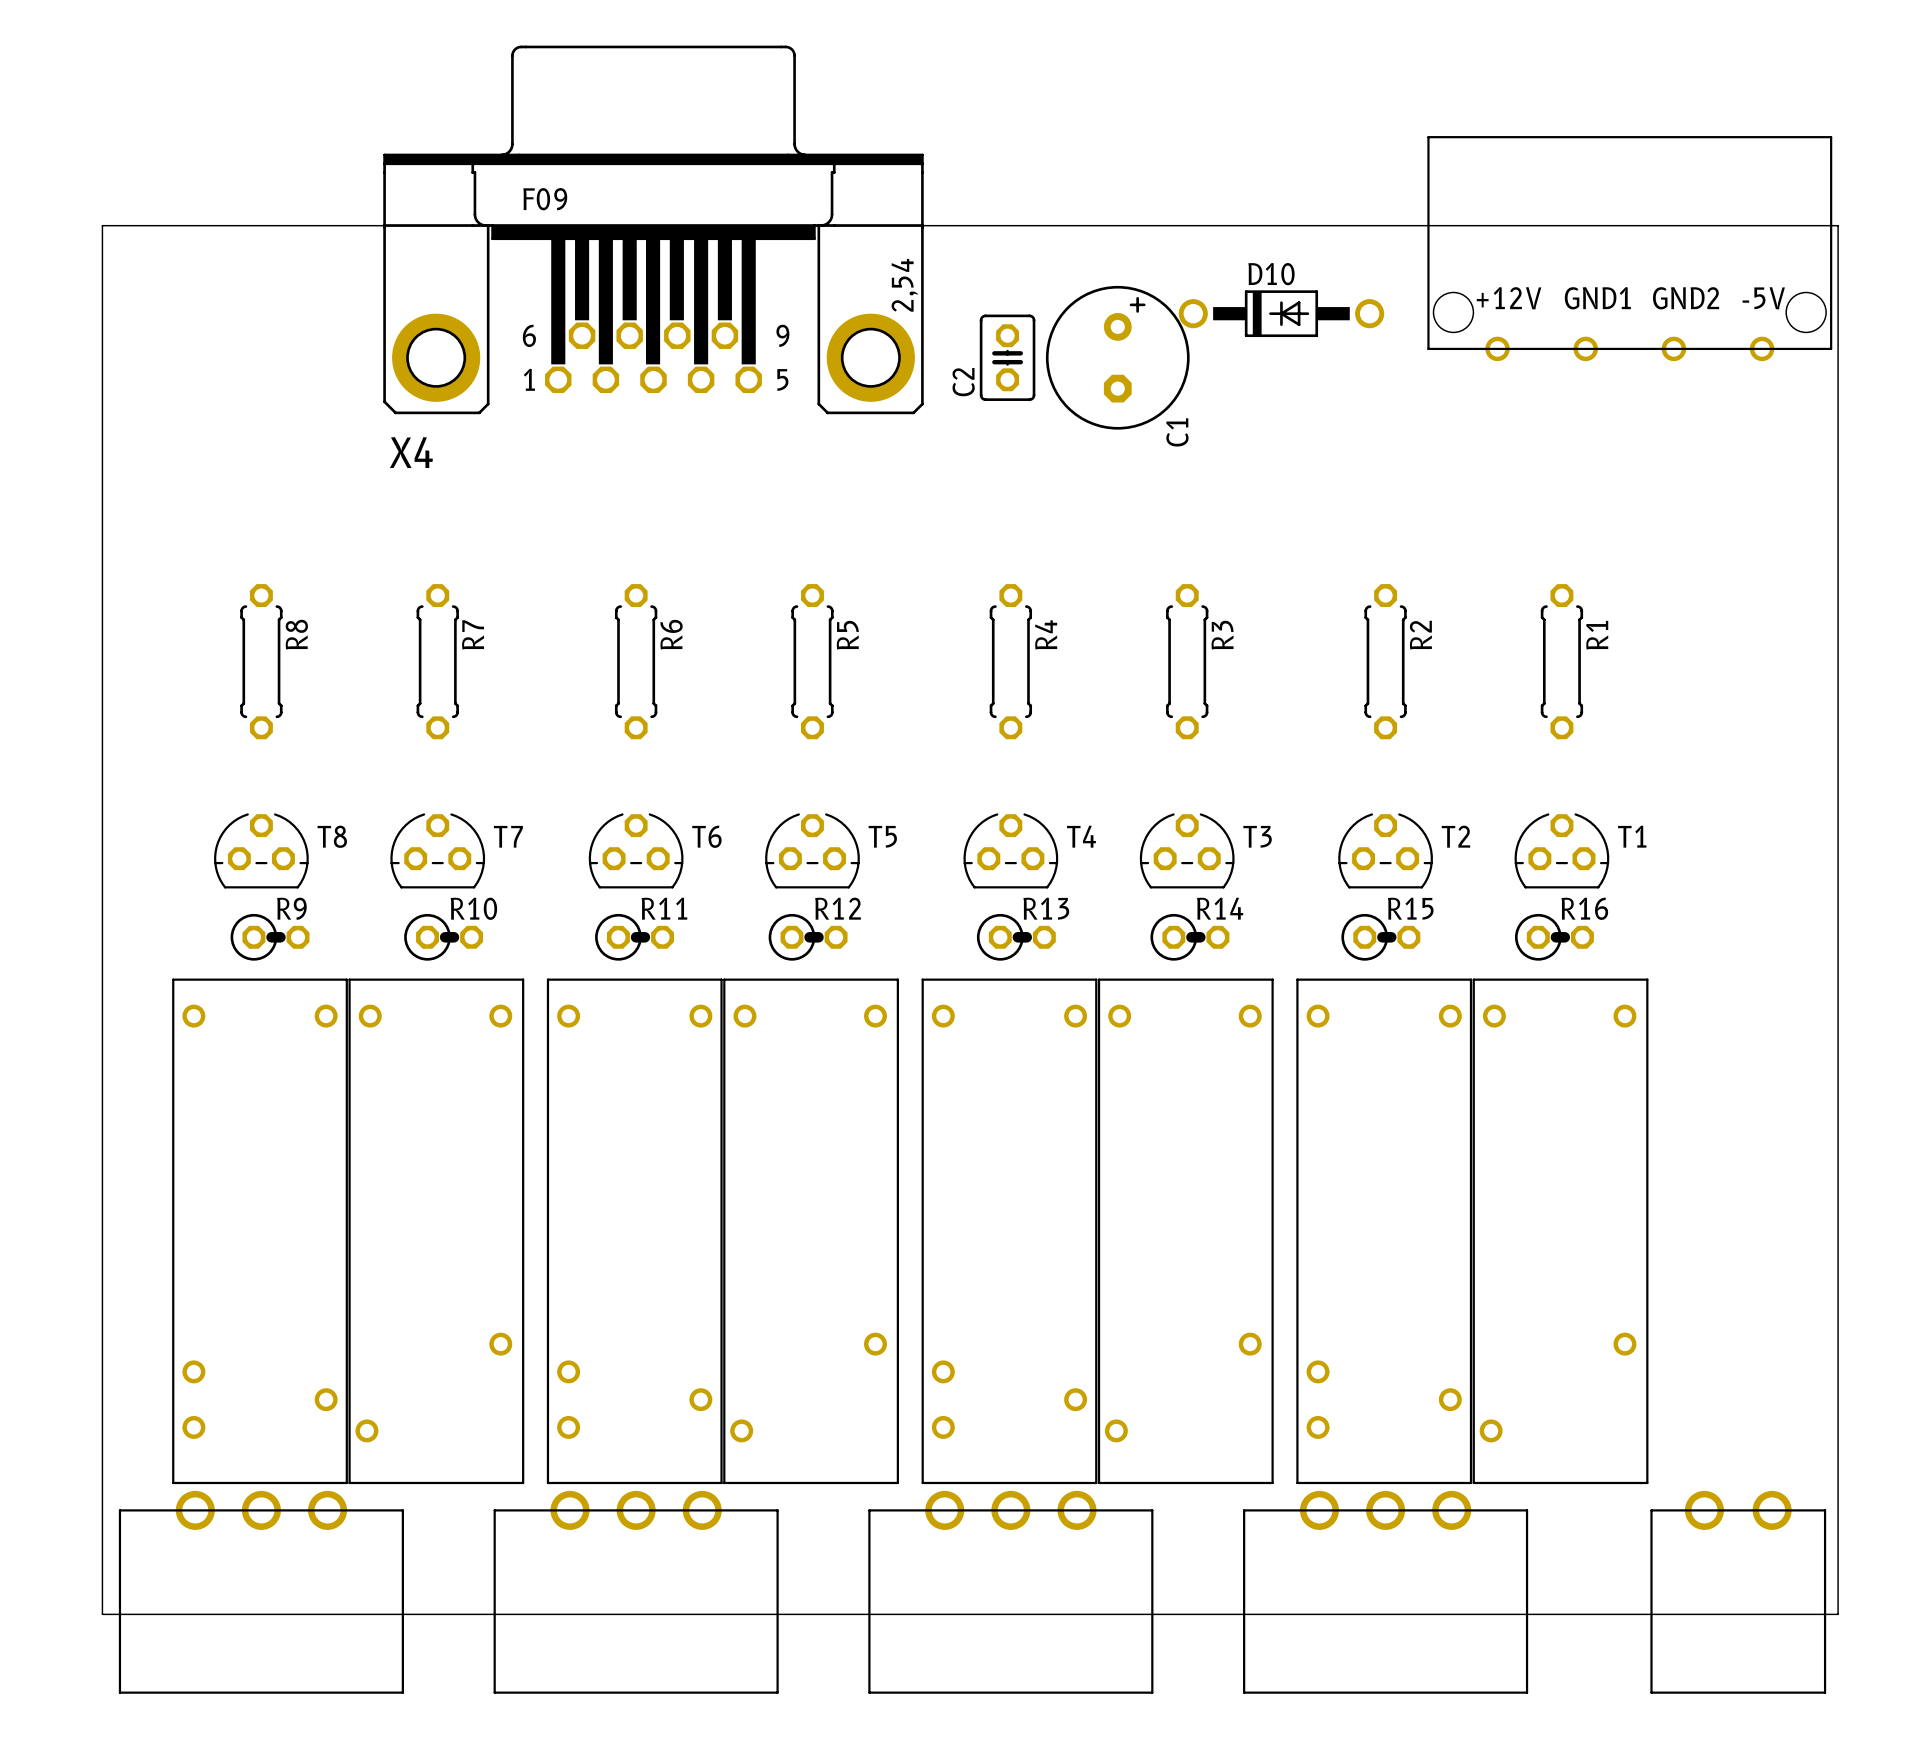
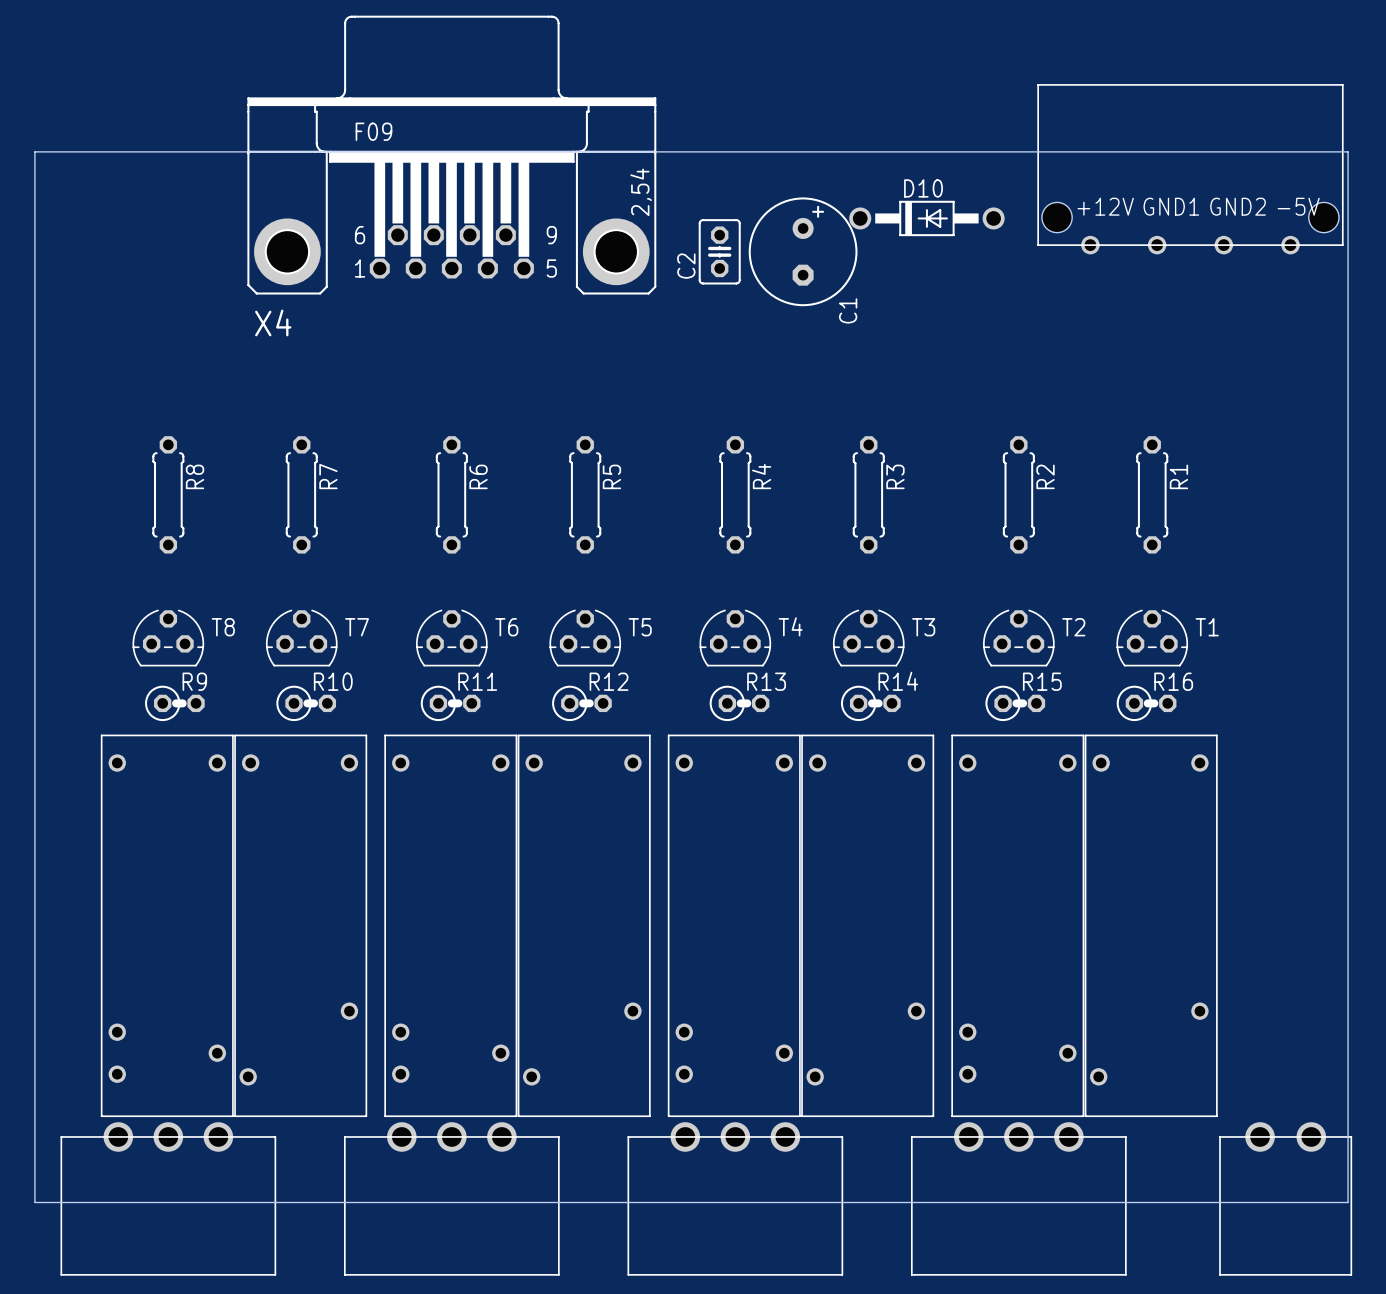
X4 position: (653, 229) -> (451, 155)
part position: (1629, 248) -> (1190, 169)
D10 position: (1281, 313) -> (926, 218)
C2 position: (1007, 357) -> (719, 251)
C1 position: (1117, 357) -> (803, 251)
board edge: (102, 1614) (102, 225) (1838, 225) (1838, 1614) -> (34, 1202) (34, 151) (1348, 151) (1348, 1202)
board edge: (102, 1614) (1838, 1614) -> (34, 1202) (1348, 1202)

